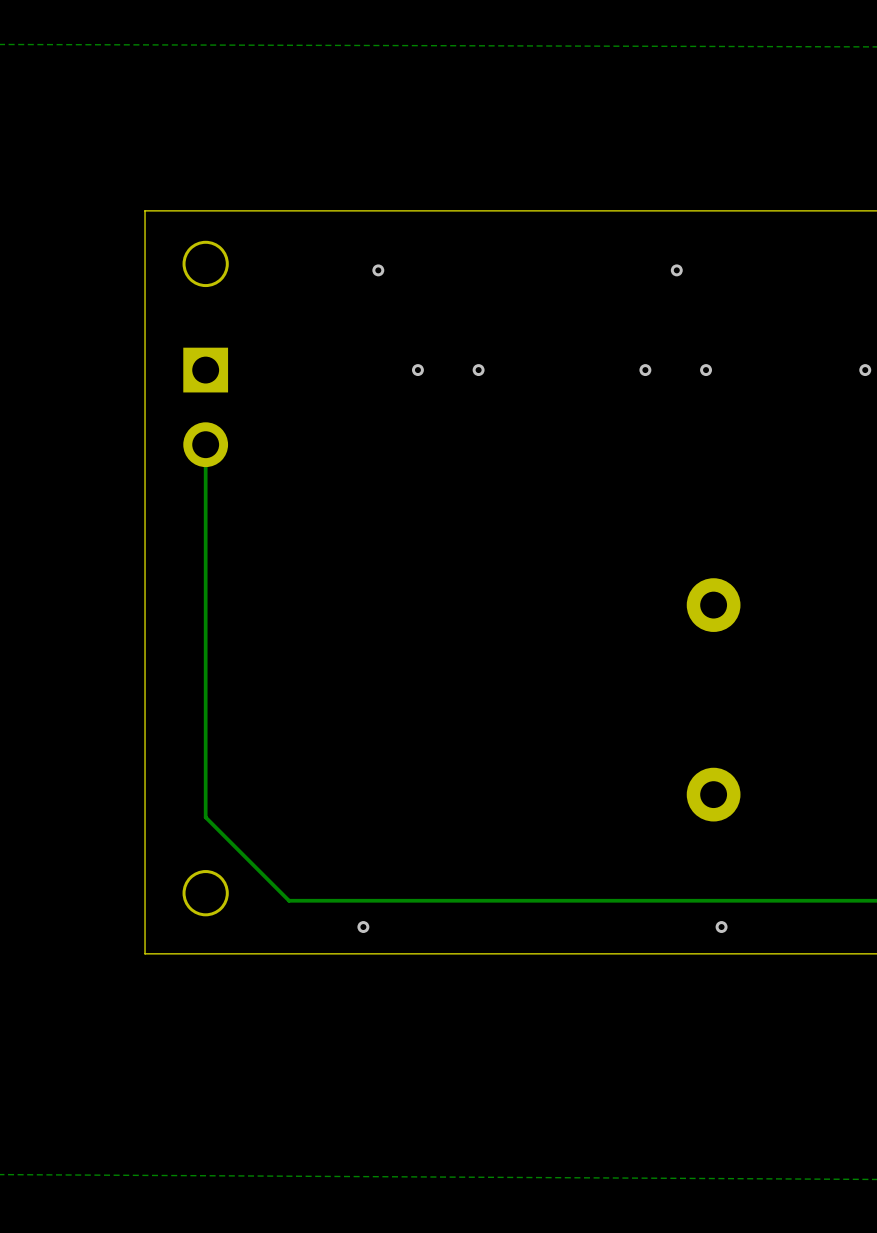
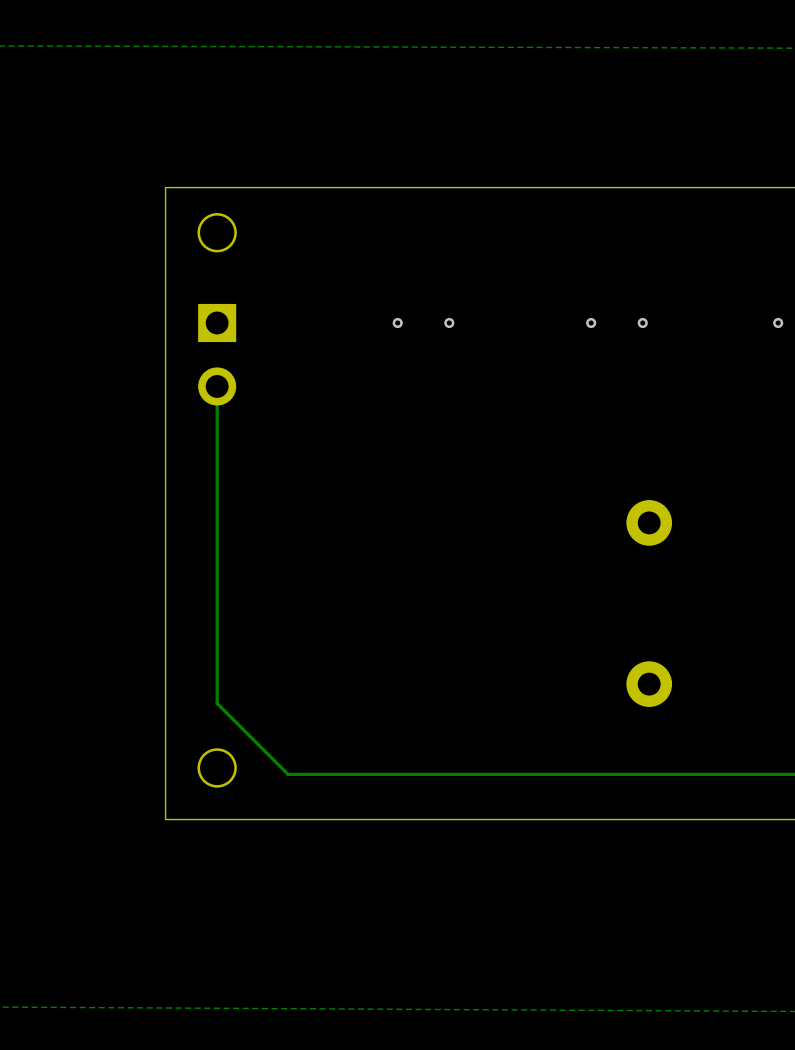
via: (378, 270) -> none
via: (676, 270) -> none
via: (363, 927) -> none
via: (721, 927) -> none

